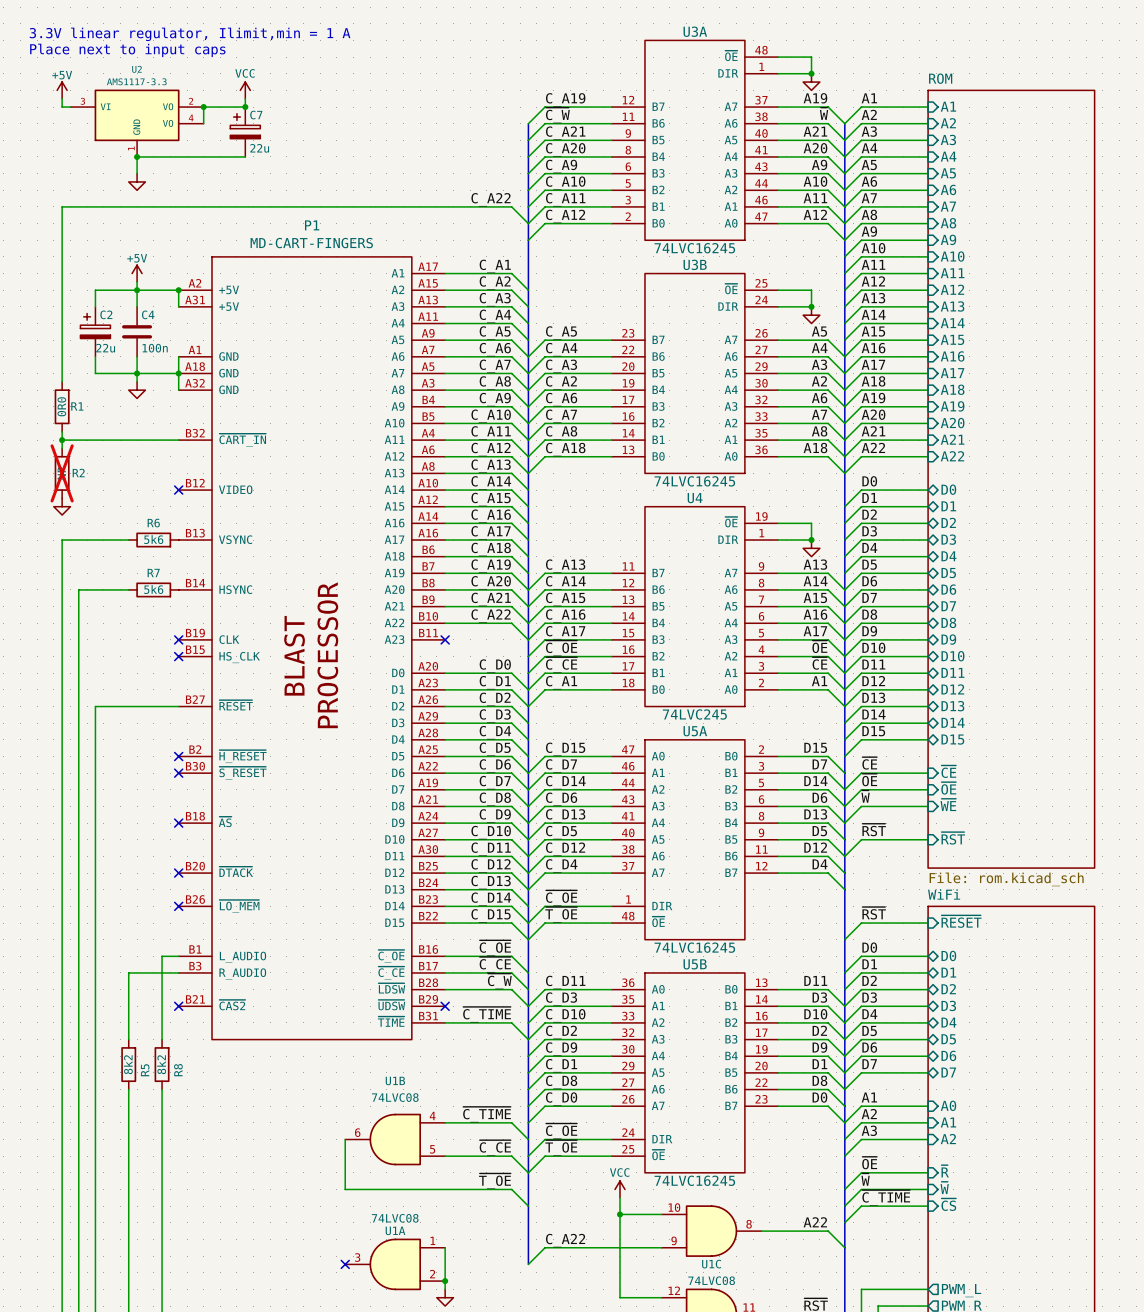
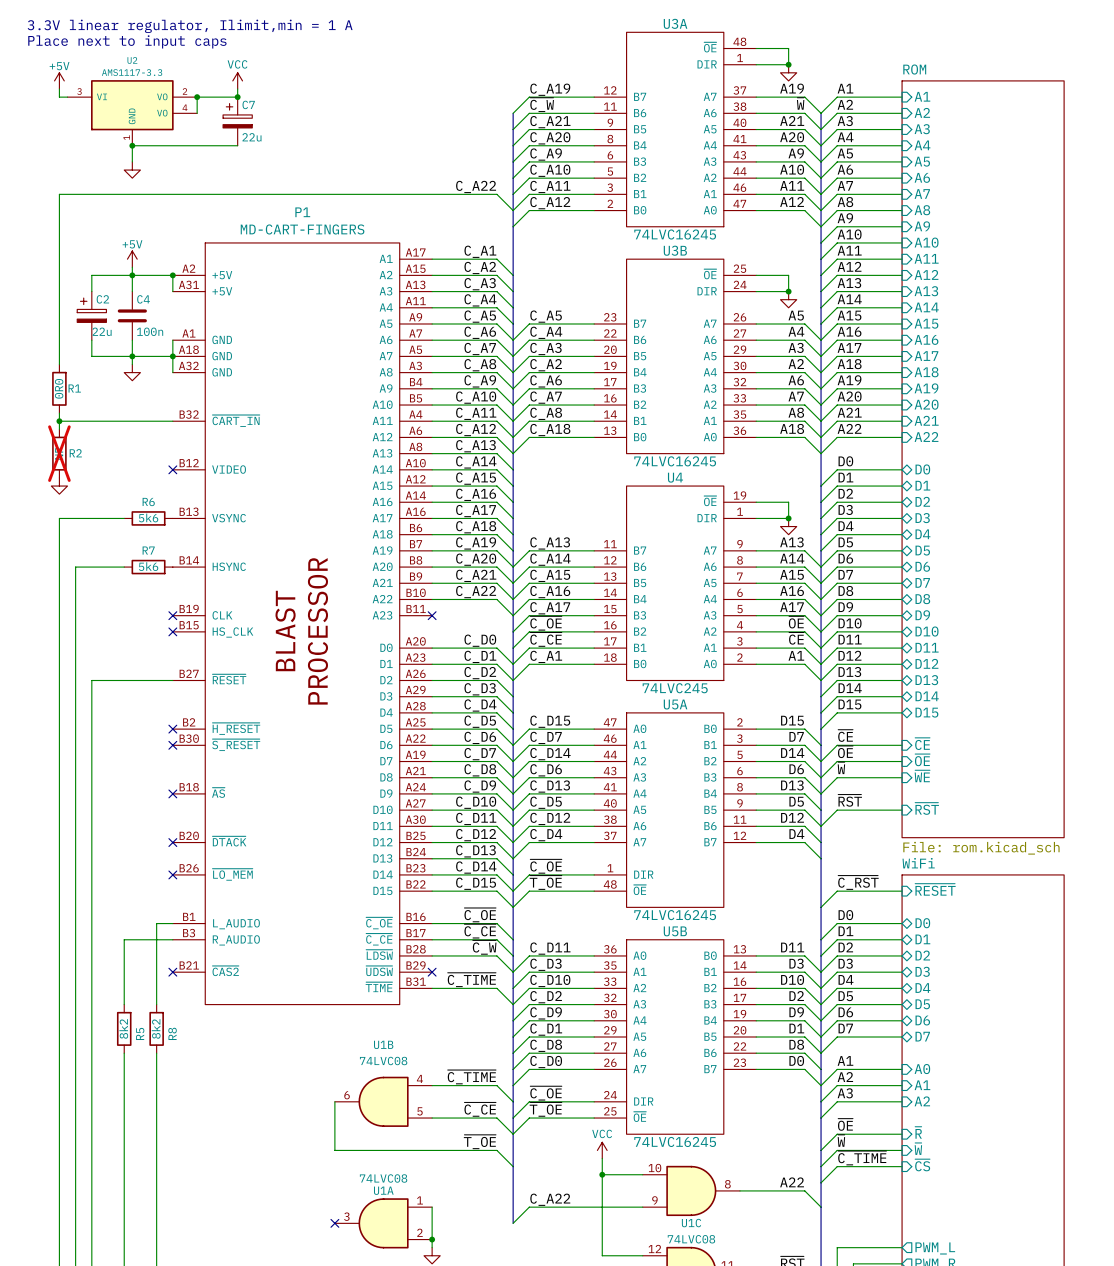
label: ~{RST} (874, 913) -> ~{C_RST} (858, 882)

